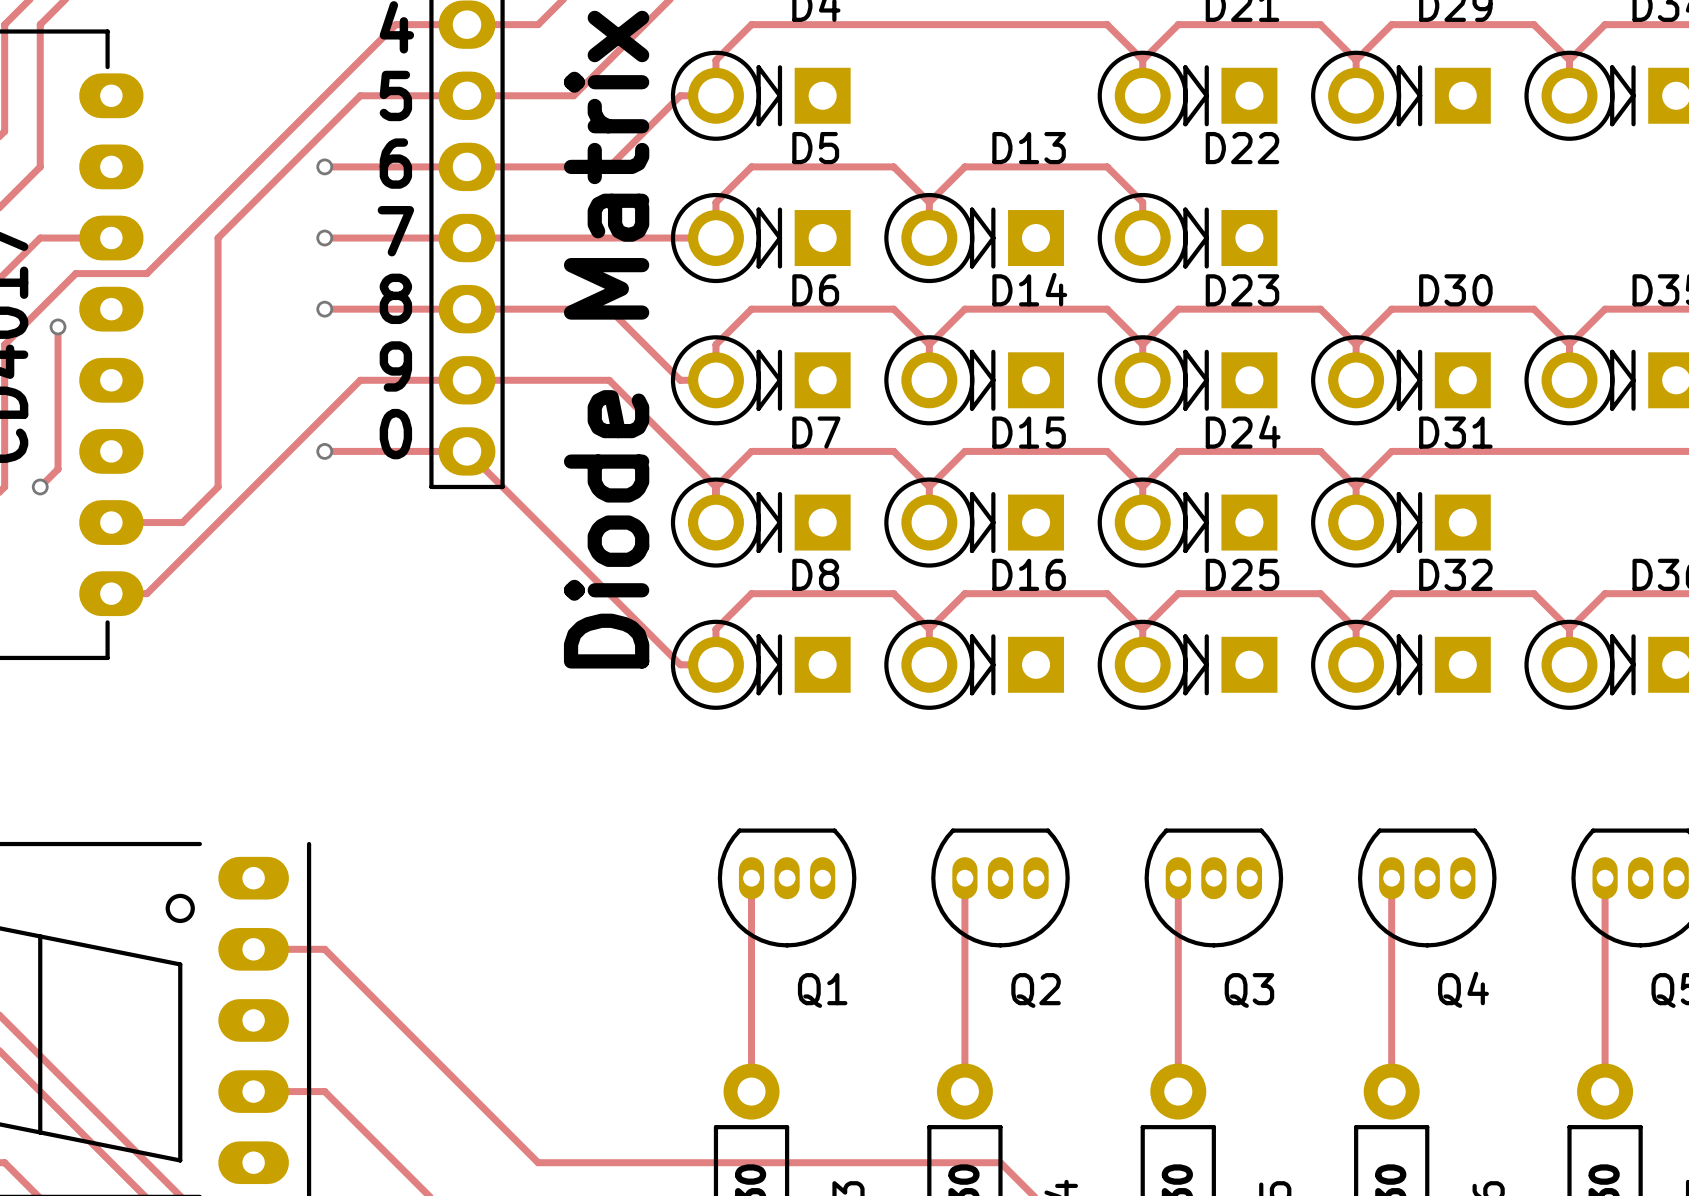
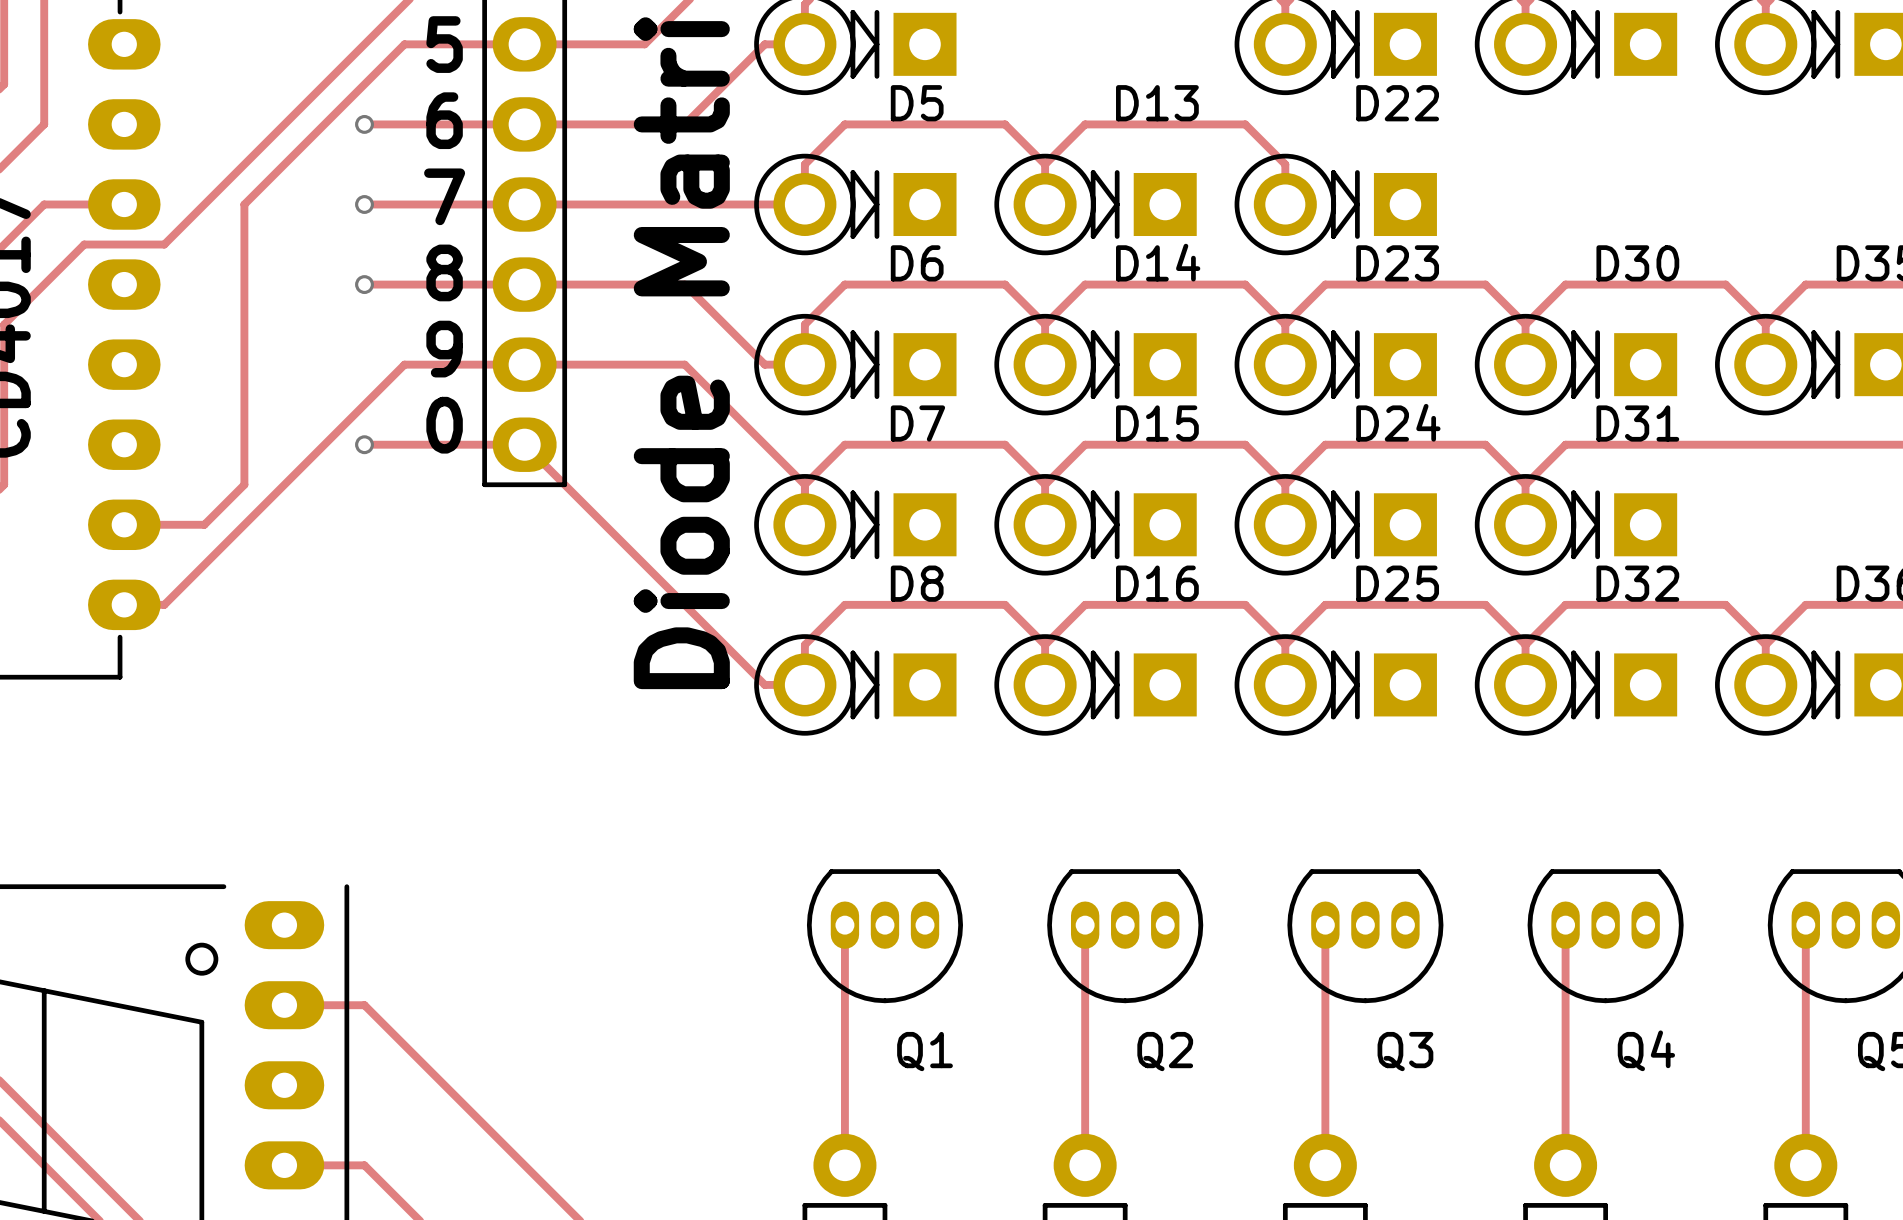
track: (58, 326) (58, 469) (40, 486) -> none
via: (58, 326) -> none
via: (40, 486) -> none

